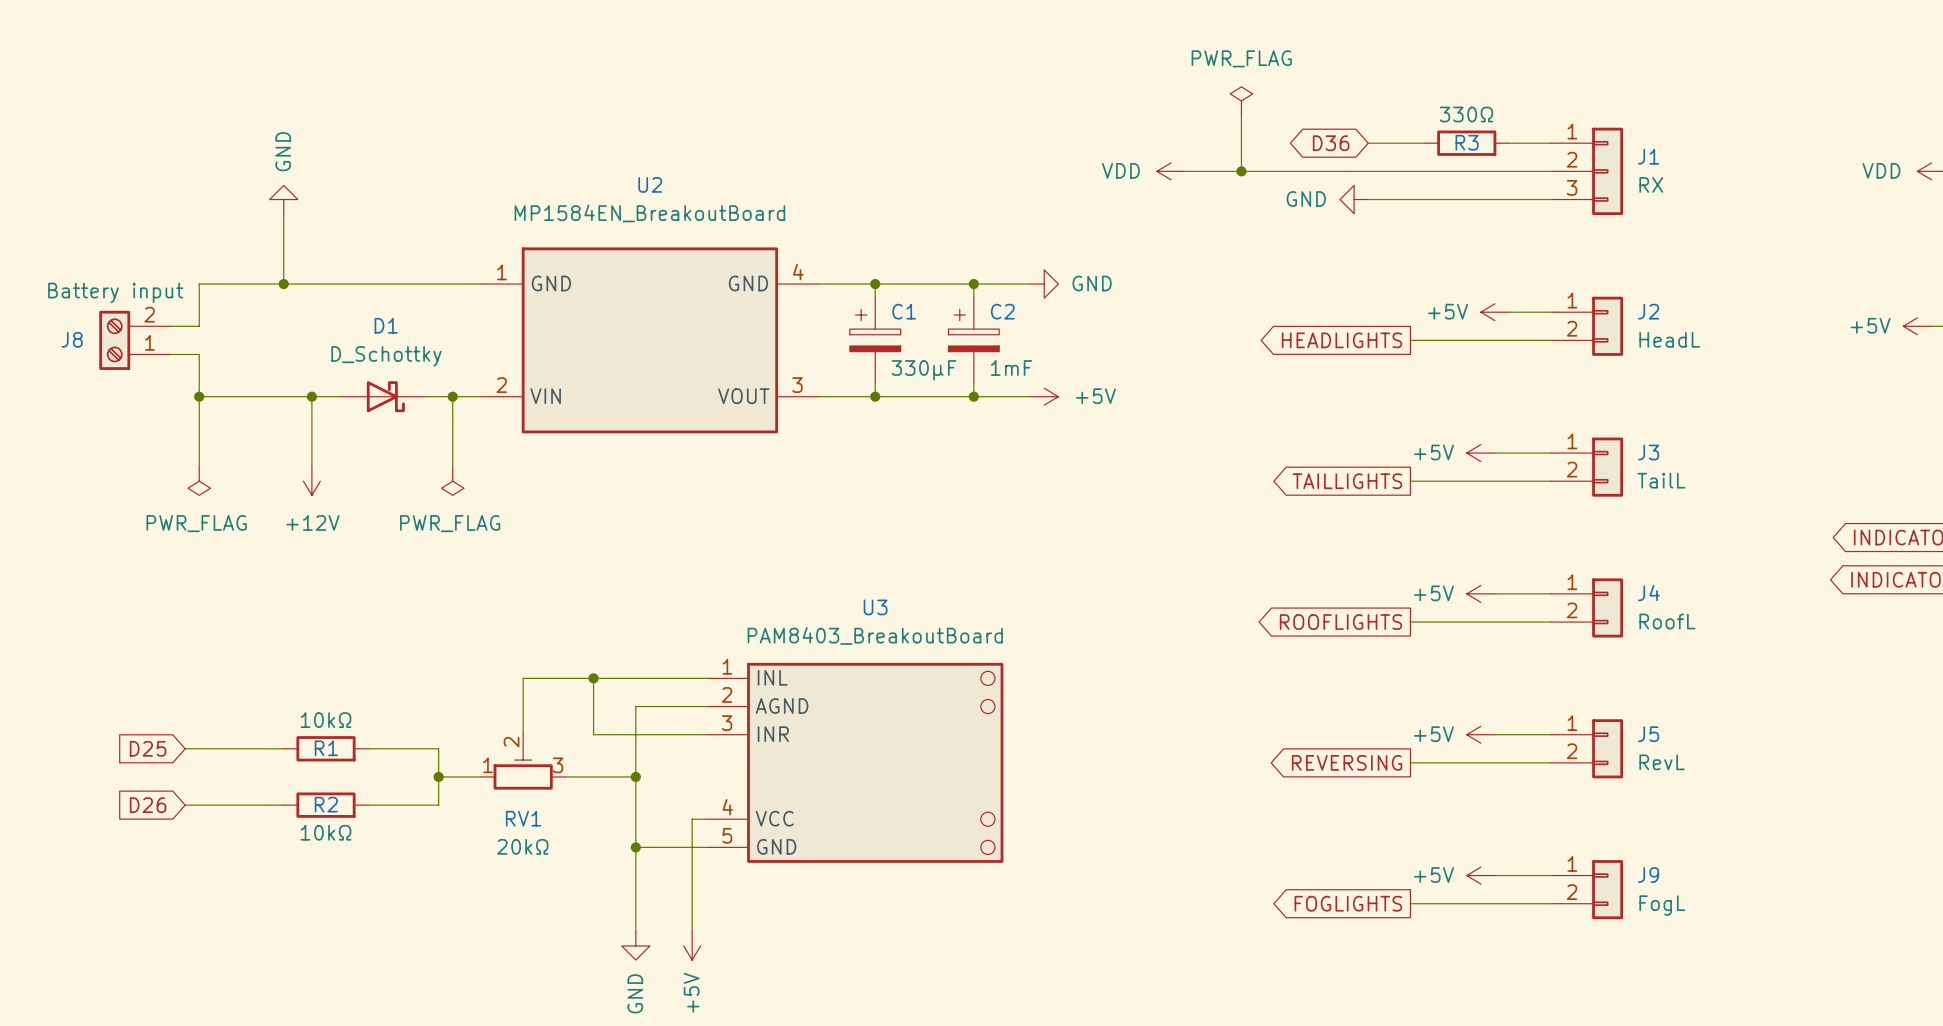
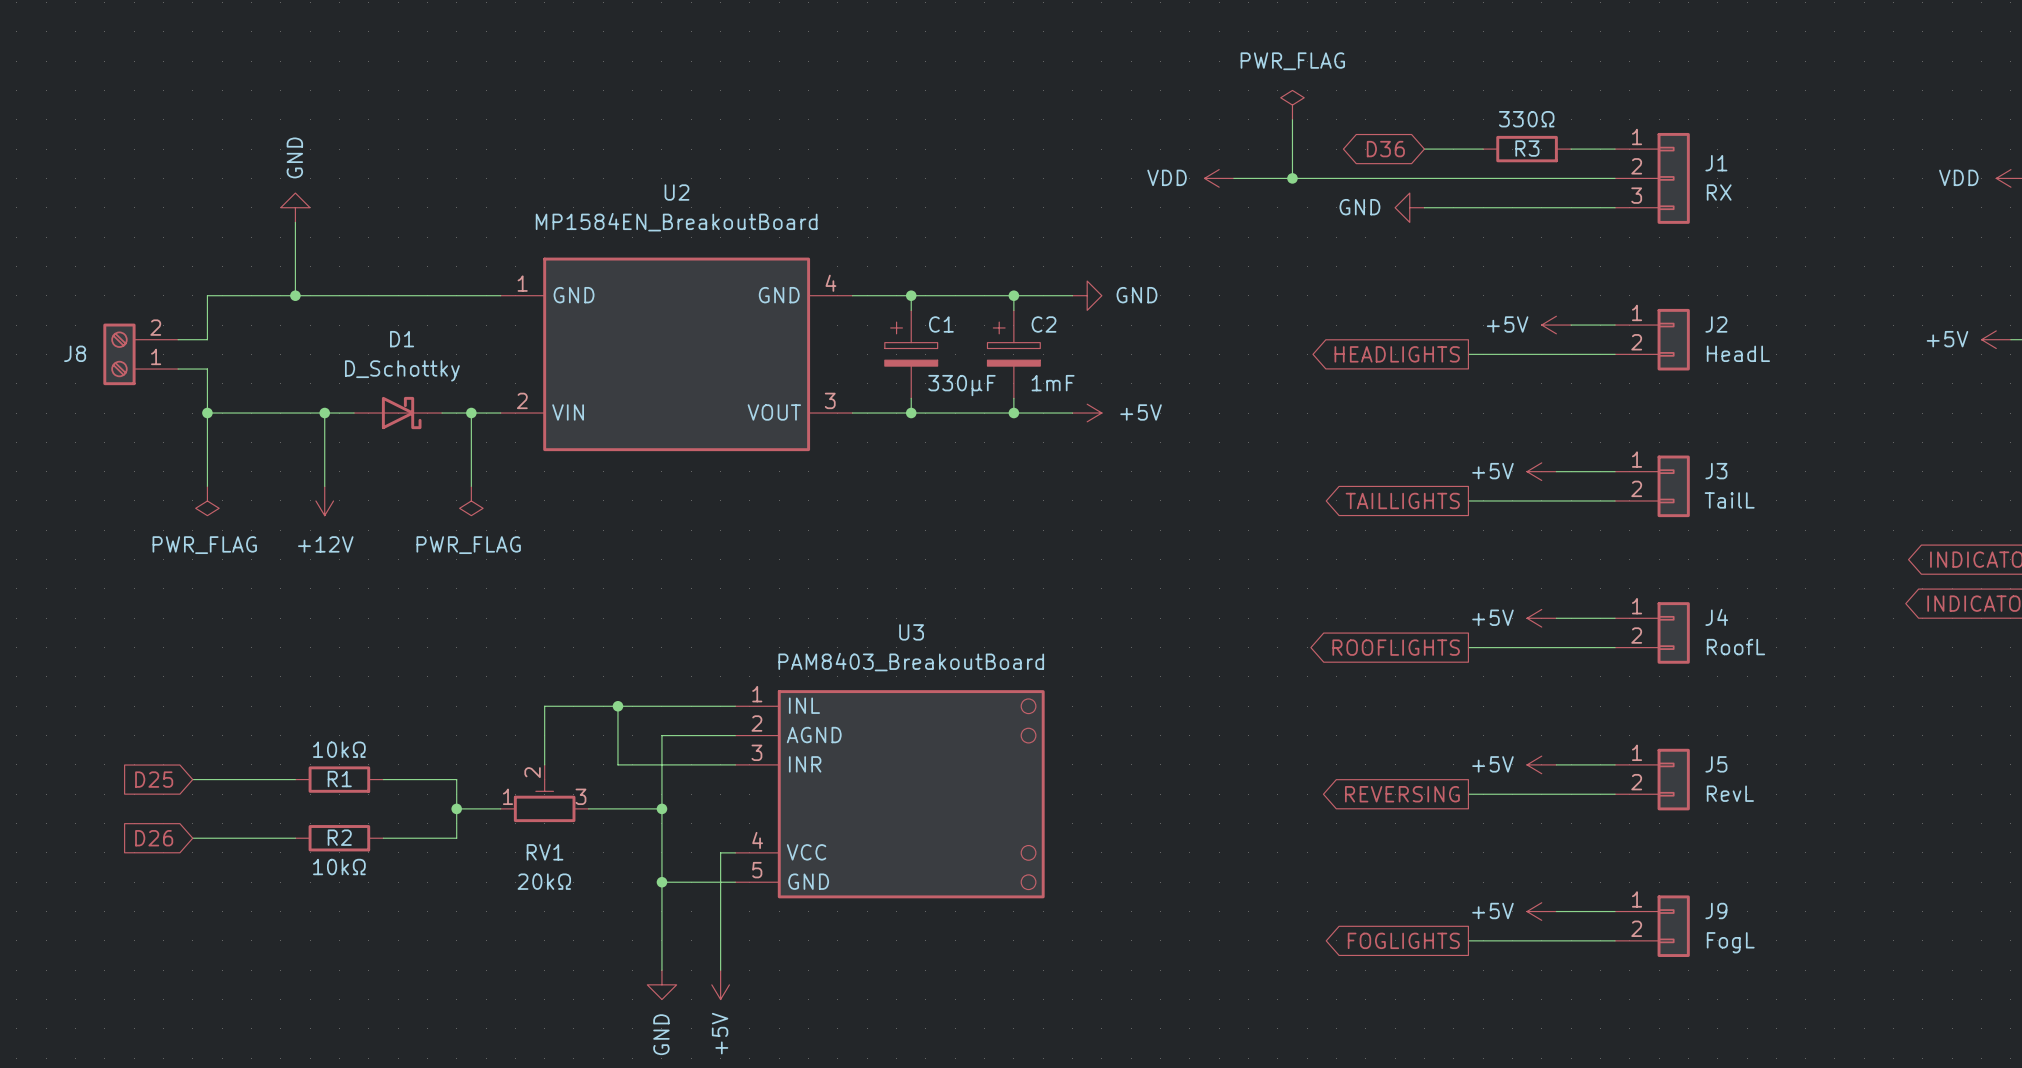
J8 value: Battery input (115, 292) -> none

